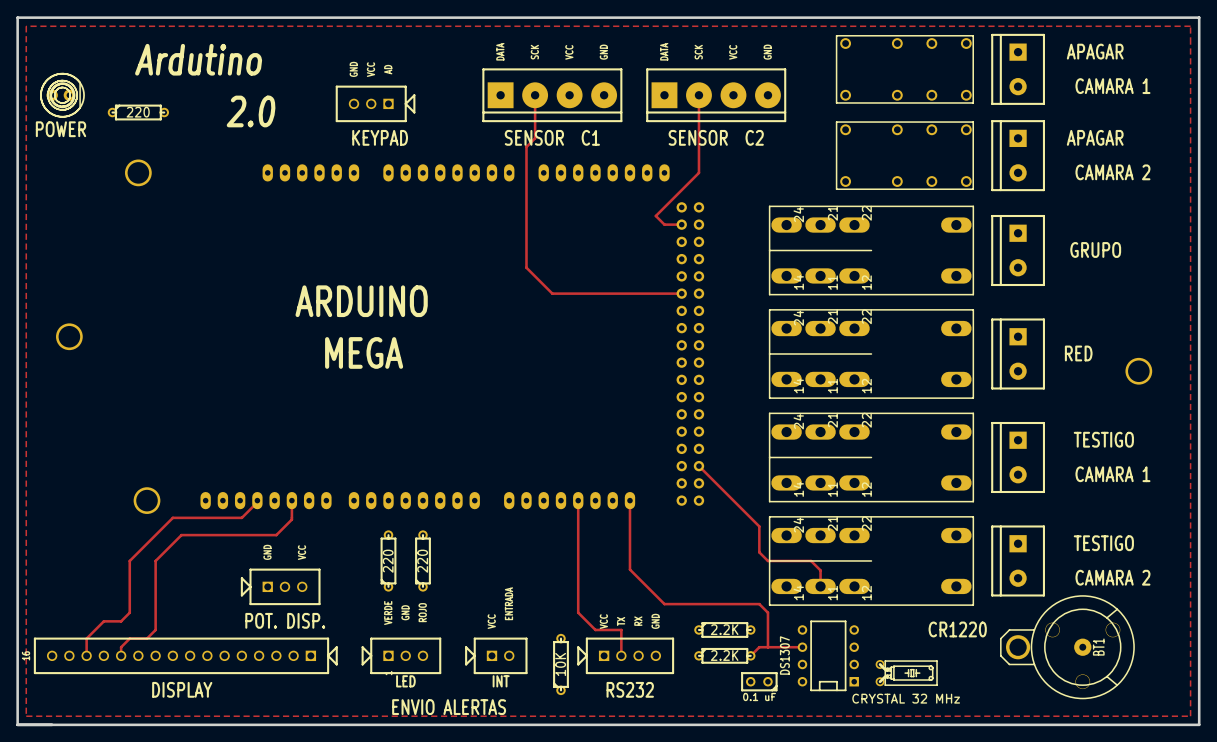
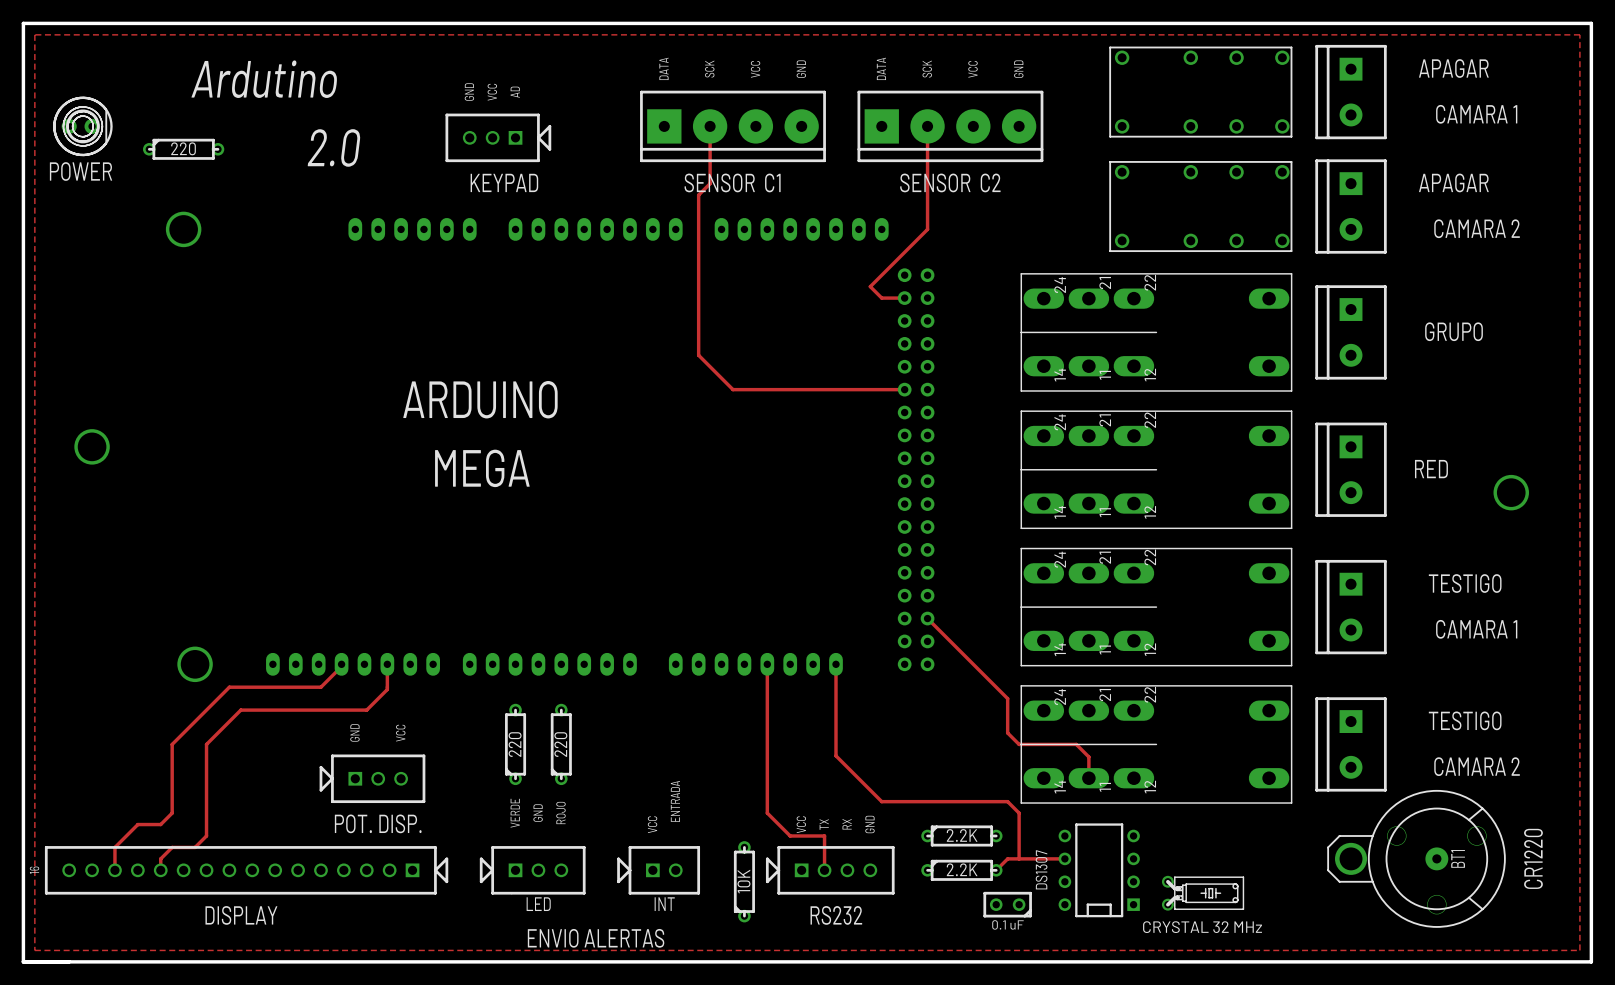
text: CR1220 (957, 629) -> none
text: none -> CR1220 (1533, 858)

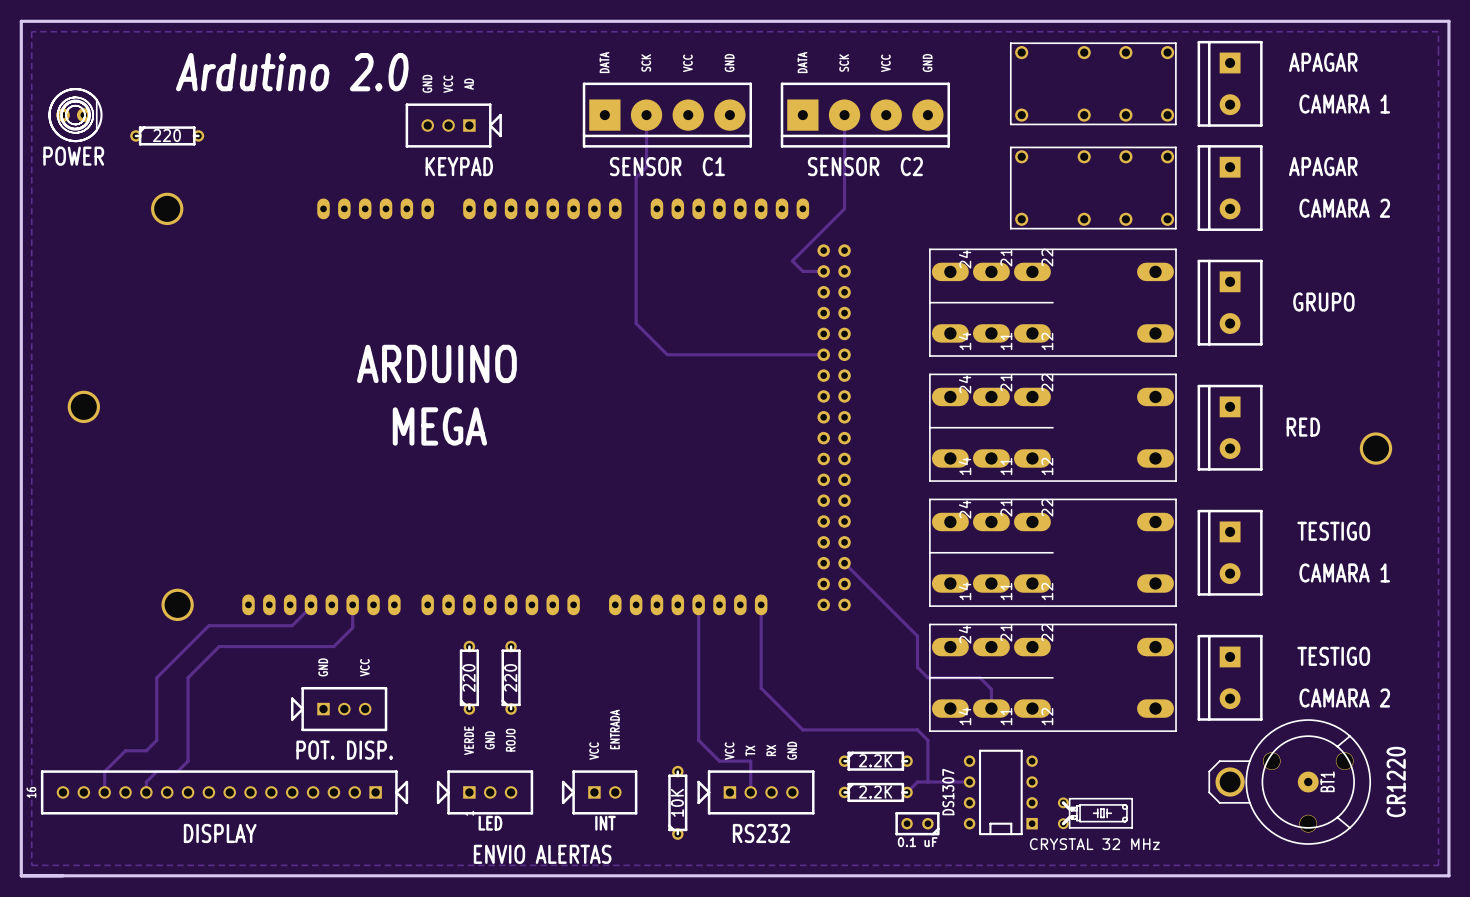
text: Ardutino (264, 79) -> Ardutino 2.0 (292, 72)
text: 2.0 (334, 147) -> none

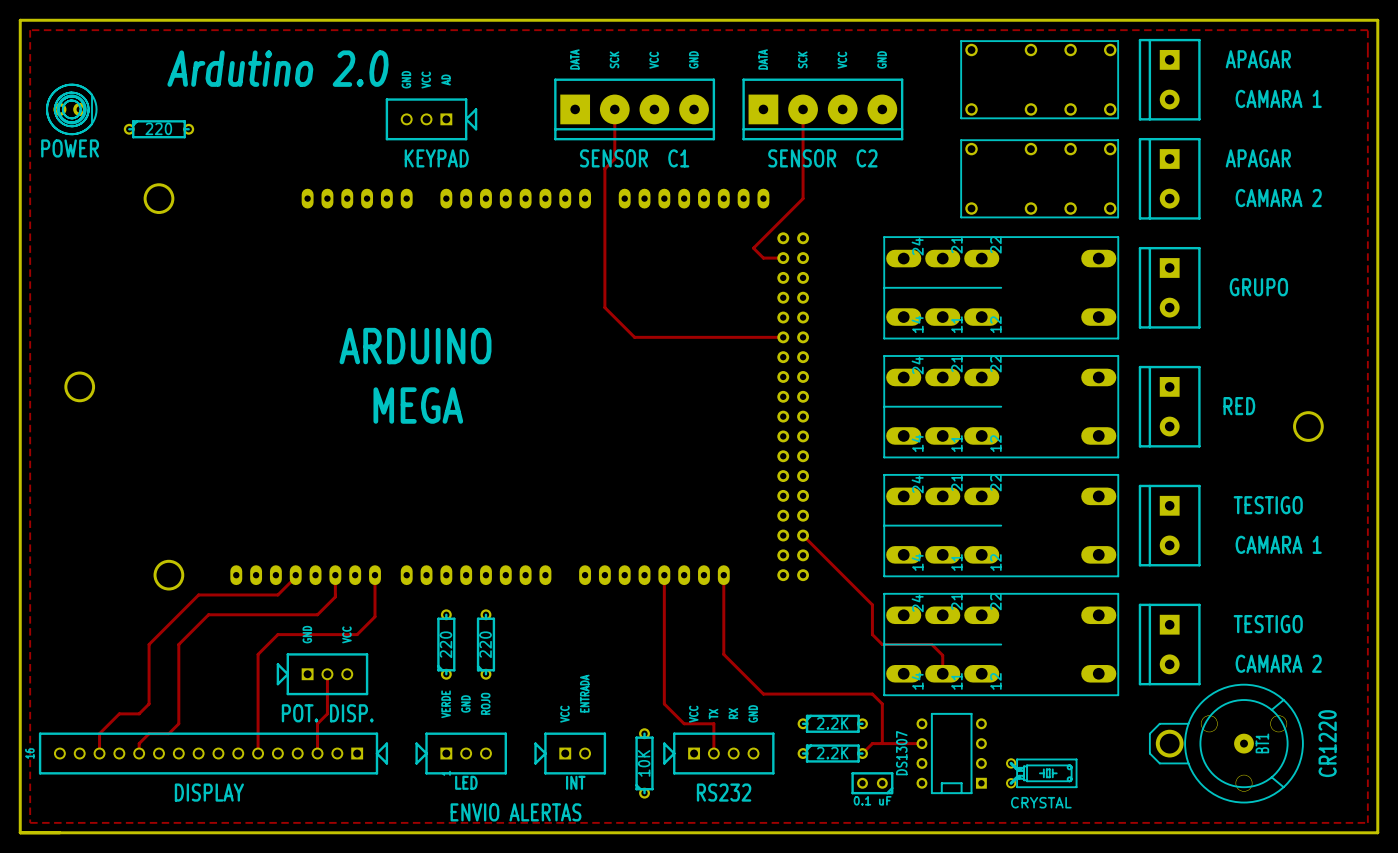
track: none -> (375, 575) (375, 616) (357, 634) (277, 634) (258, 654) (258, 753)
track: none -> (327, 674) (327, 713) (317, 723) (317, 753)
part value: CRYSTAL 32 MHz (1094, 844) -> CRYSTAL (1041, 802)

